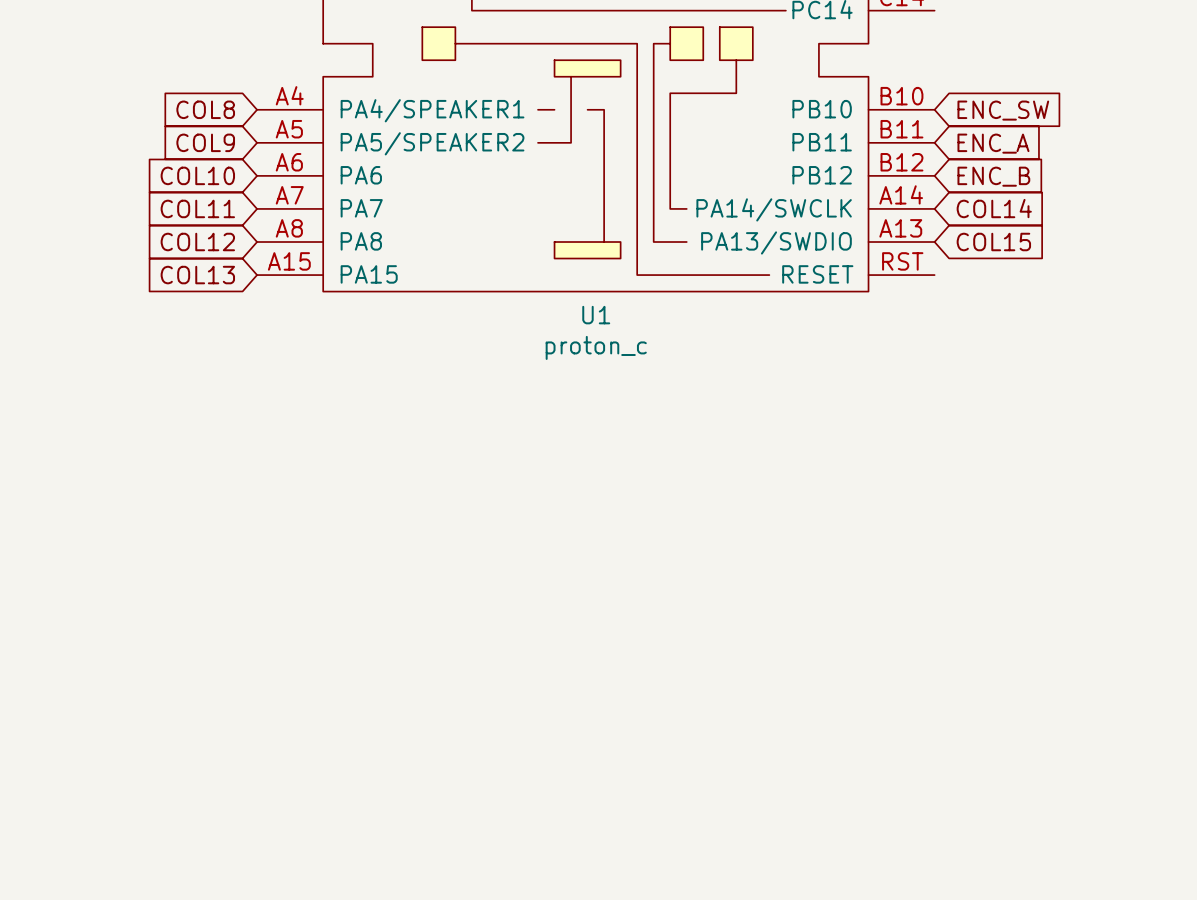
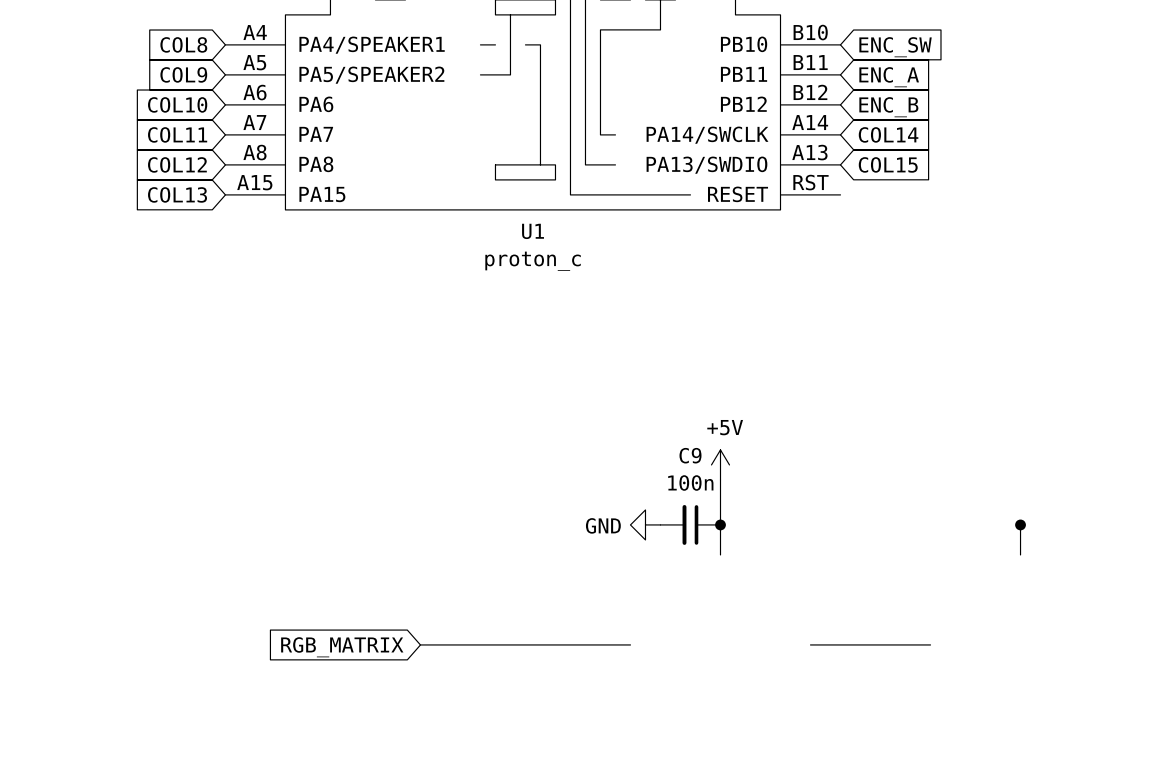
power symbol: none -> +5V (720, 464)
wire: none -> (720, 479) (720, 554)
power symbol: none -> GND (645, 524)
C9: none -> 100n (690, 524)
junction: none -> (720, 524)
wire: none -> (1020, 524) (1020, 554)
junction: none -> (1020, 524)
wire: none -> (420, 644) (630, 644)
wire: none -> (810, 644) (930, 644)
global label: none -> RGB_MATRIX (342, 647)

